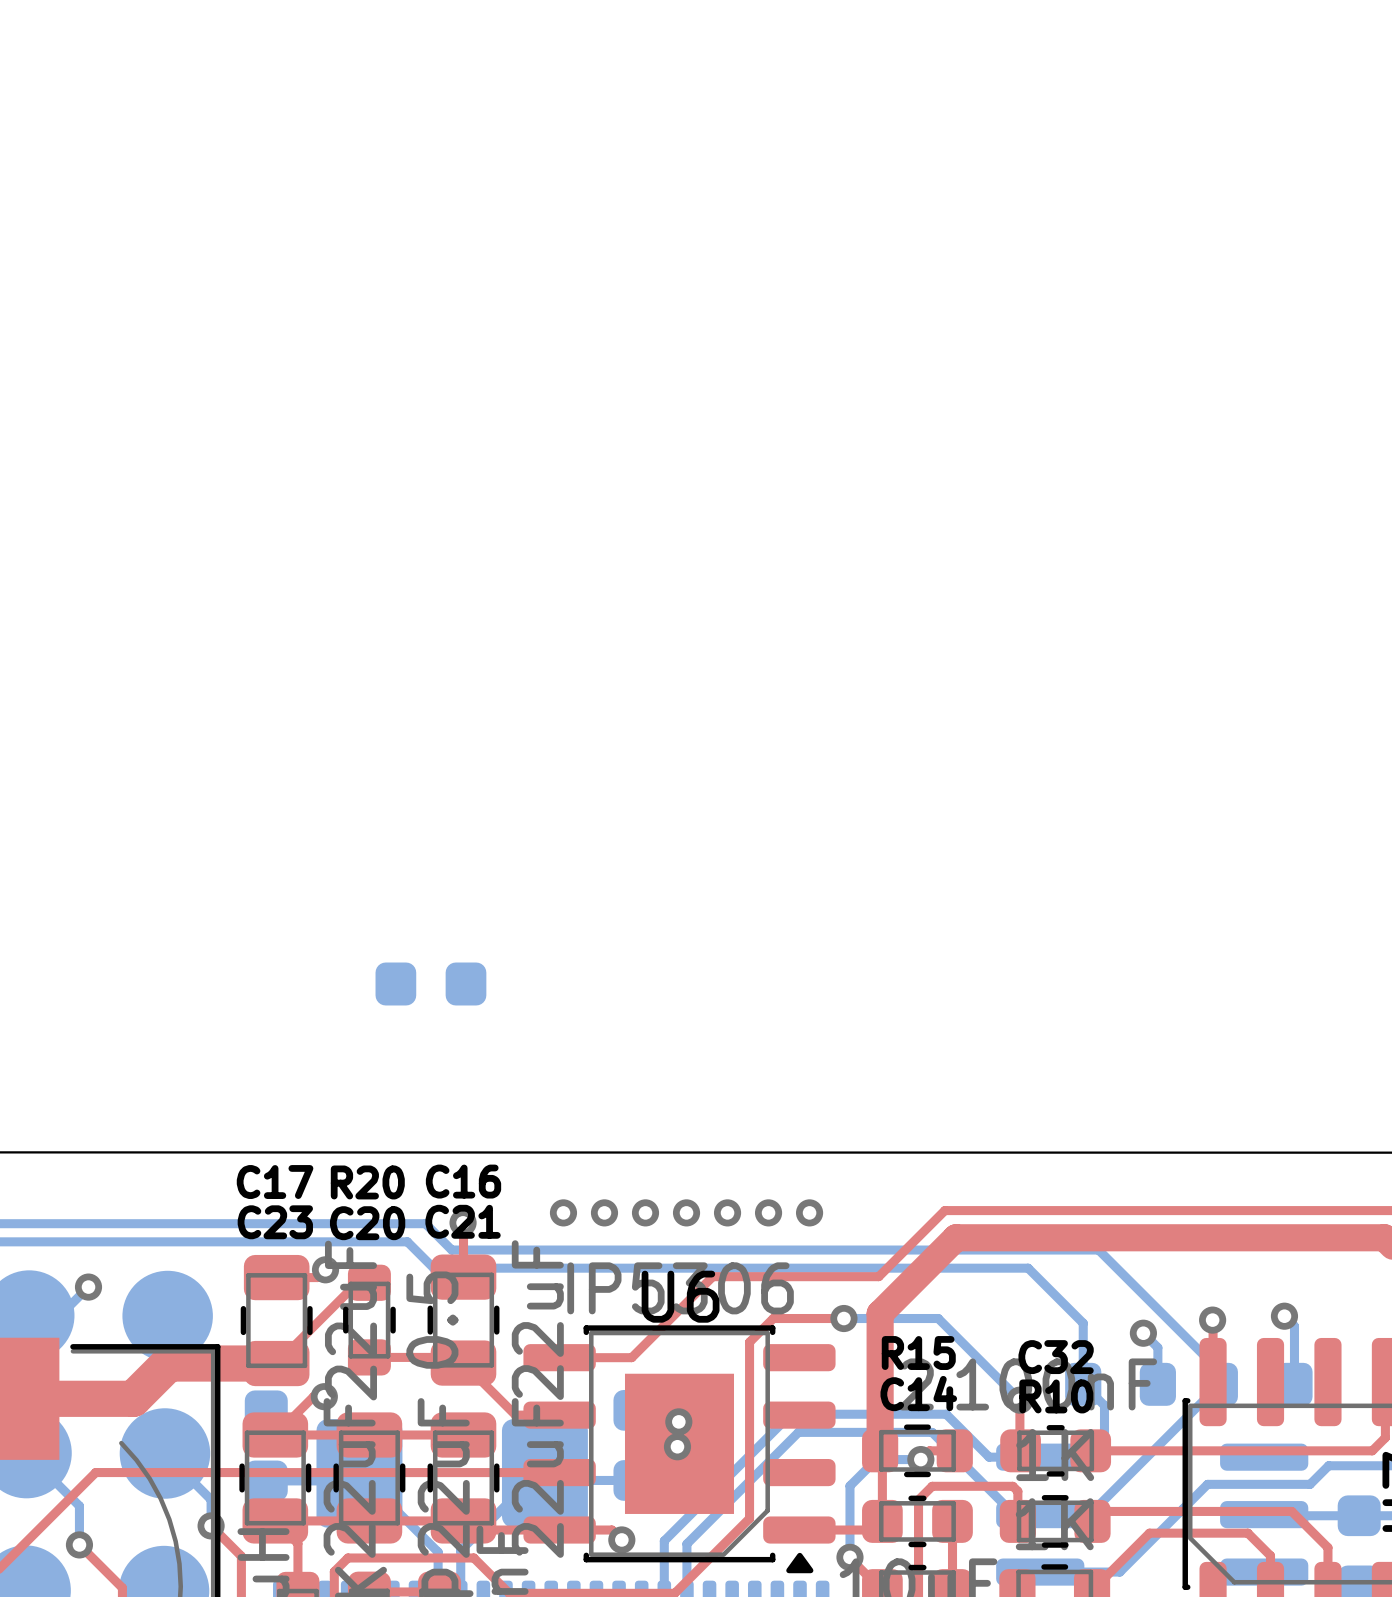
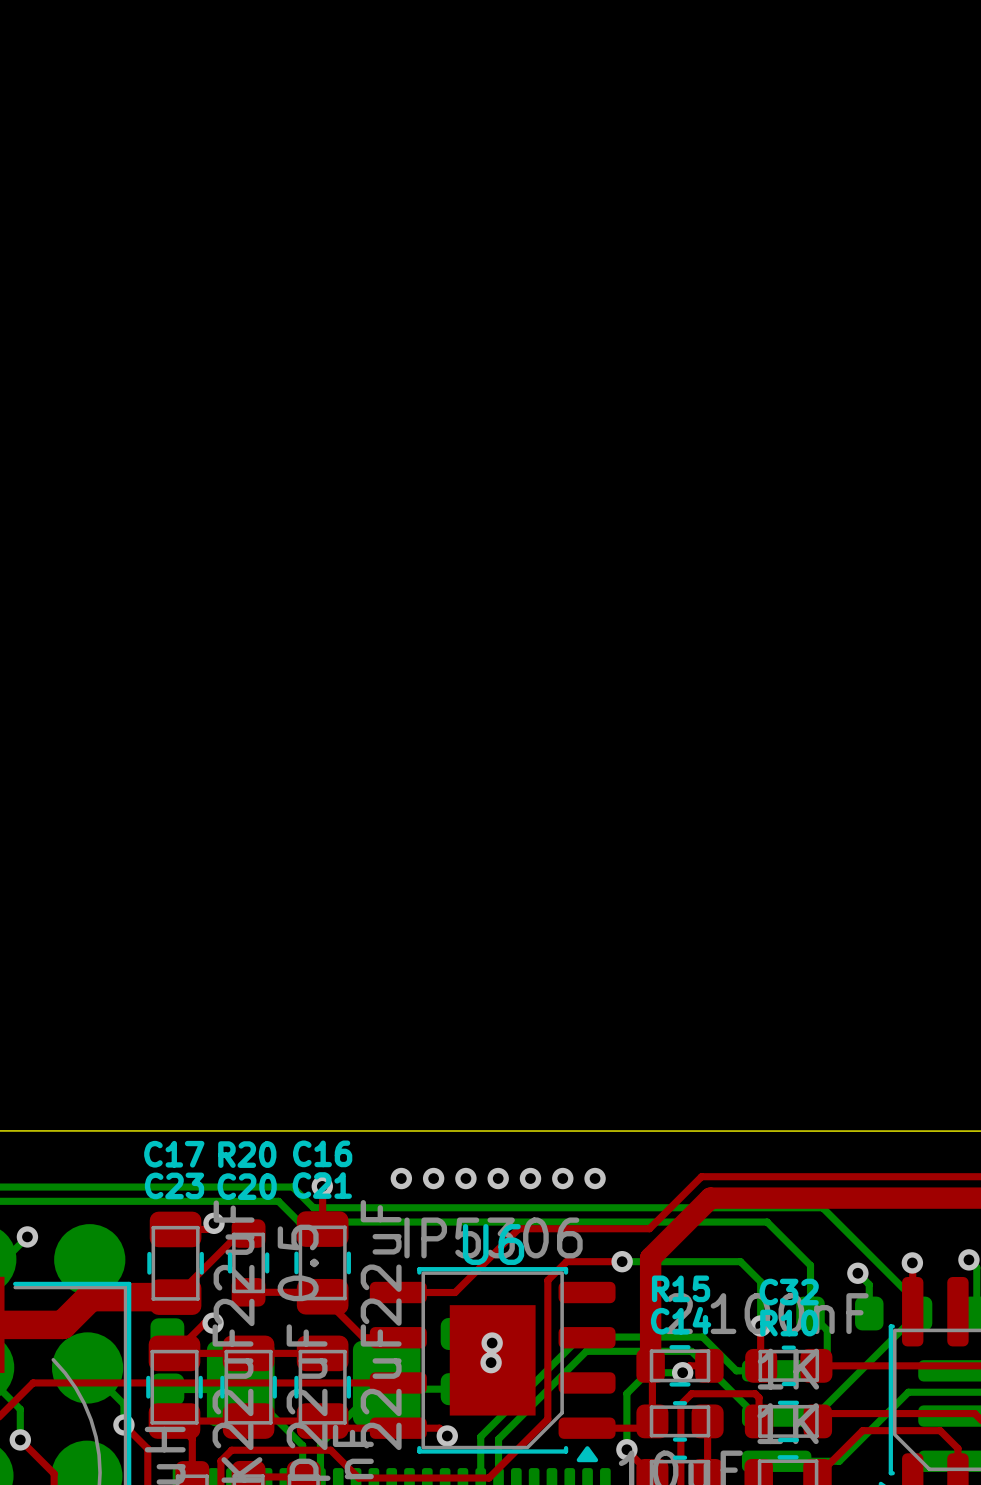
part: (430, 983) -> none
bottom track: (938, 1318) (1019, 1400) -> (696, 1261) (740, 1261) (760, 1281) (760, 1325)

